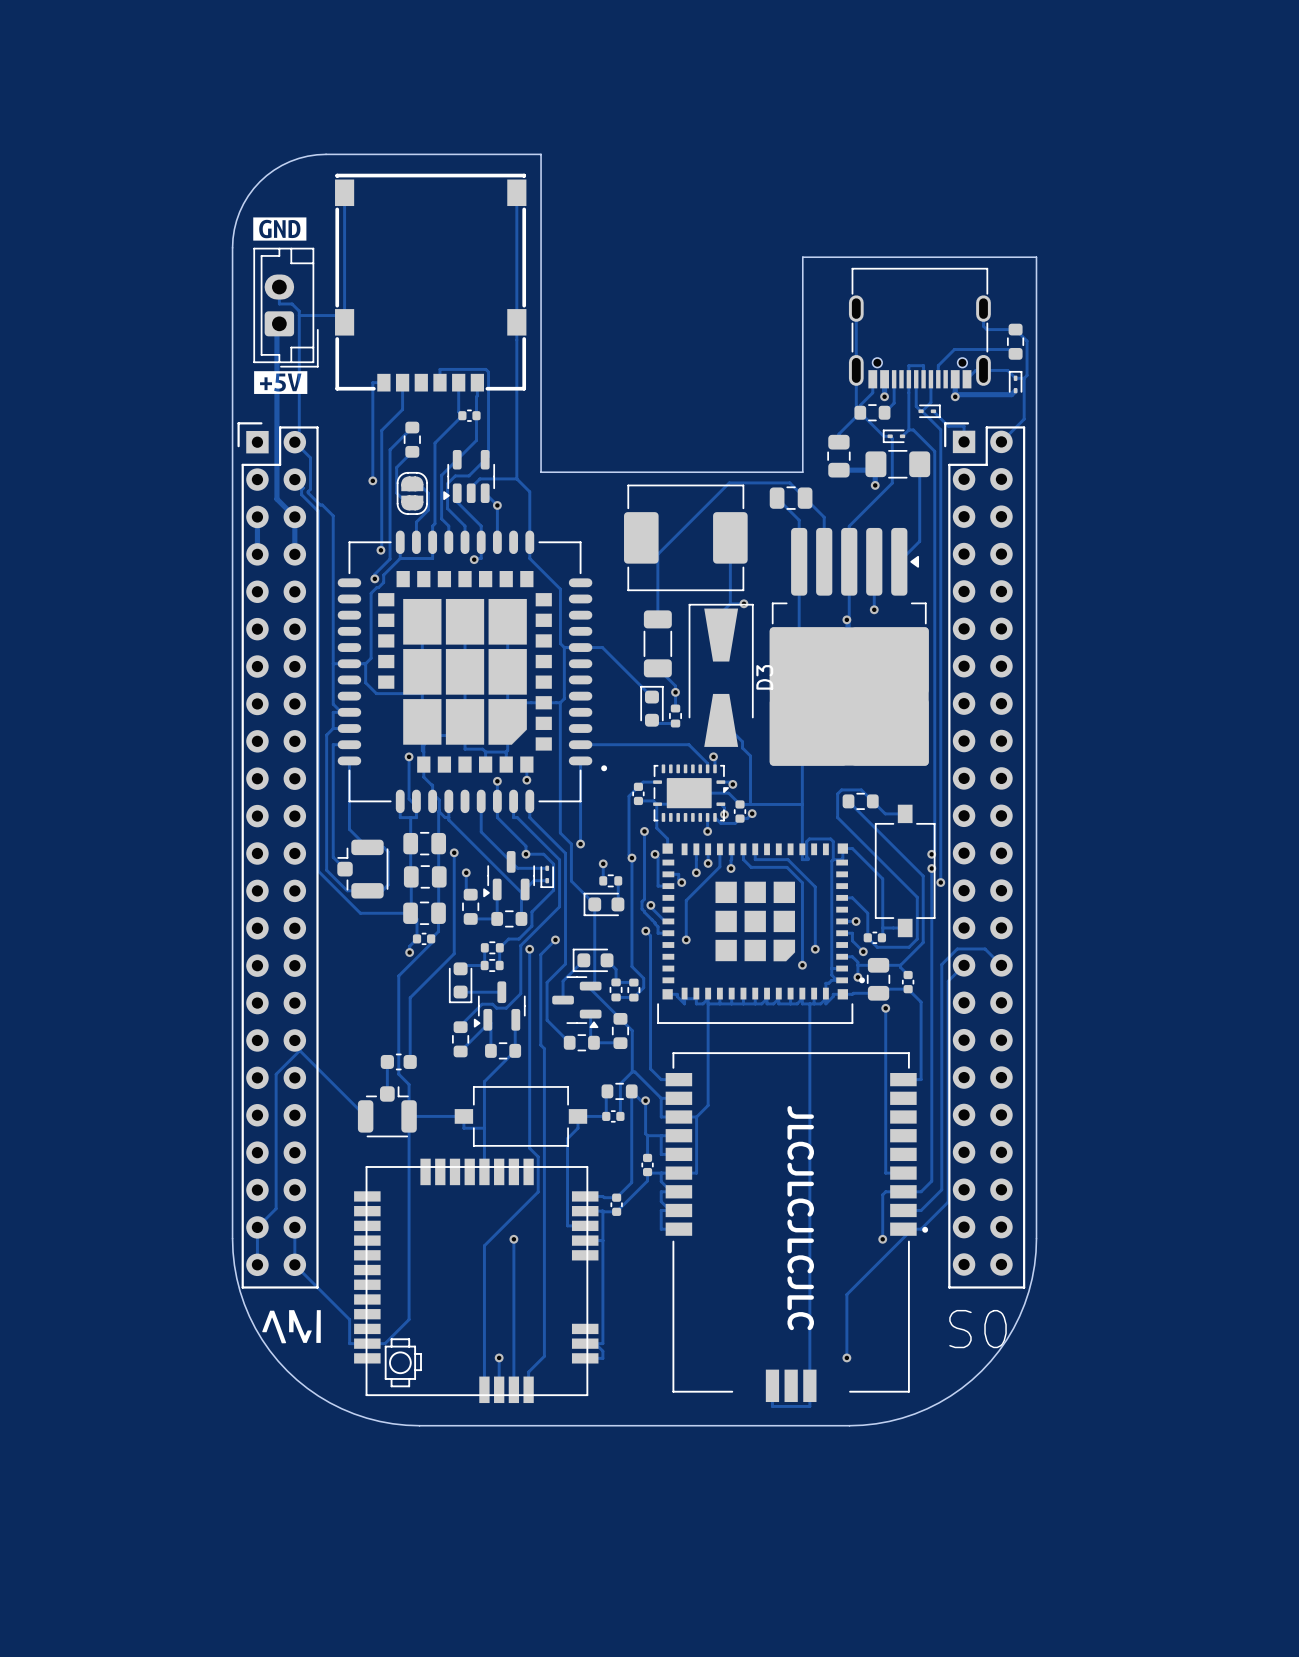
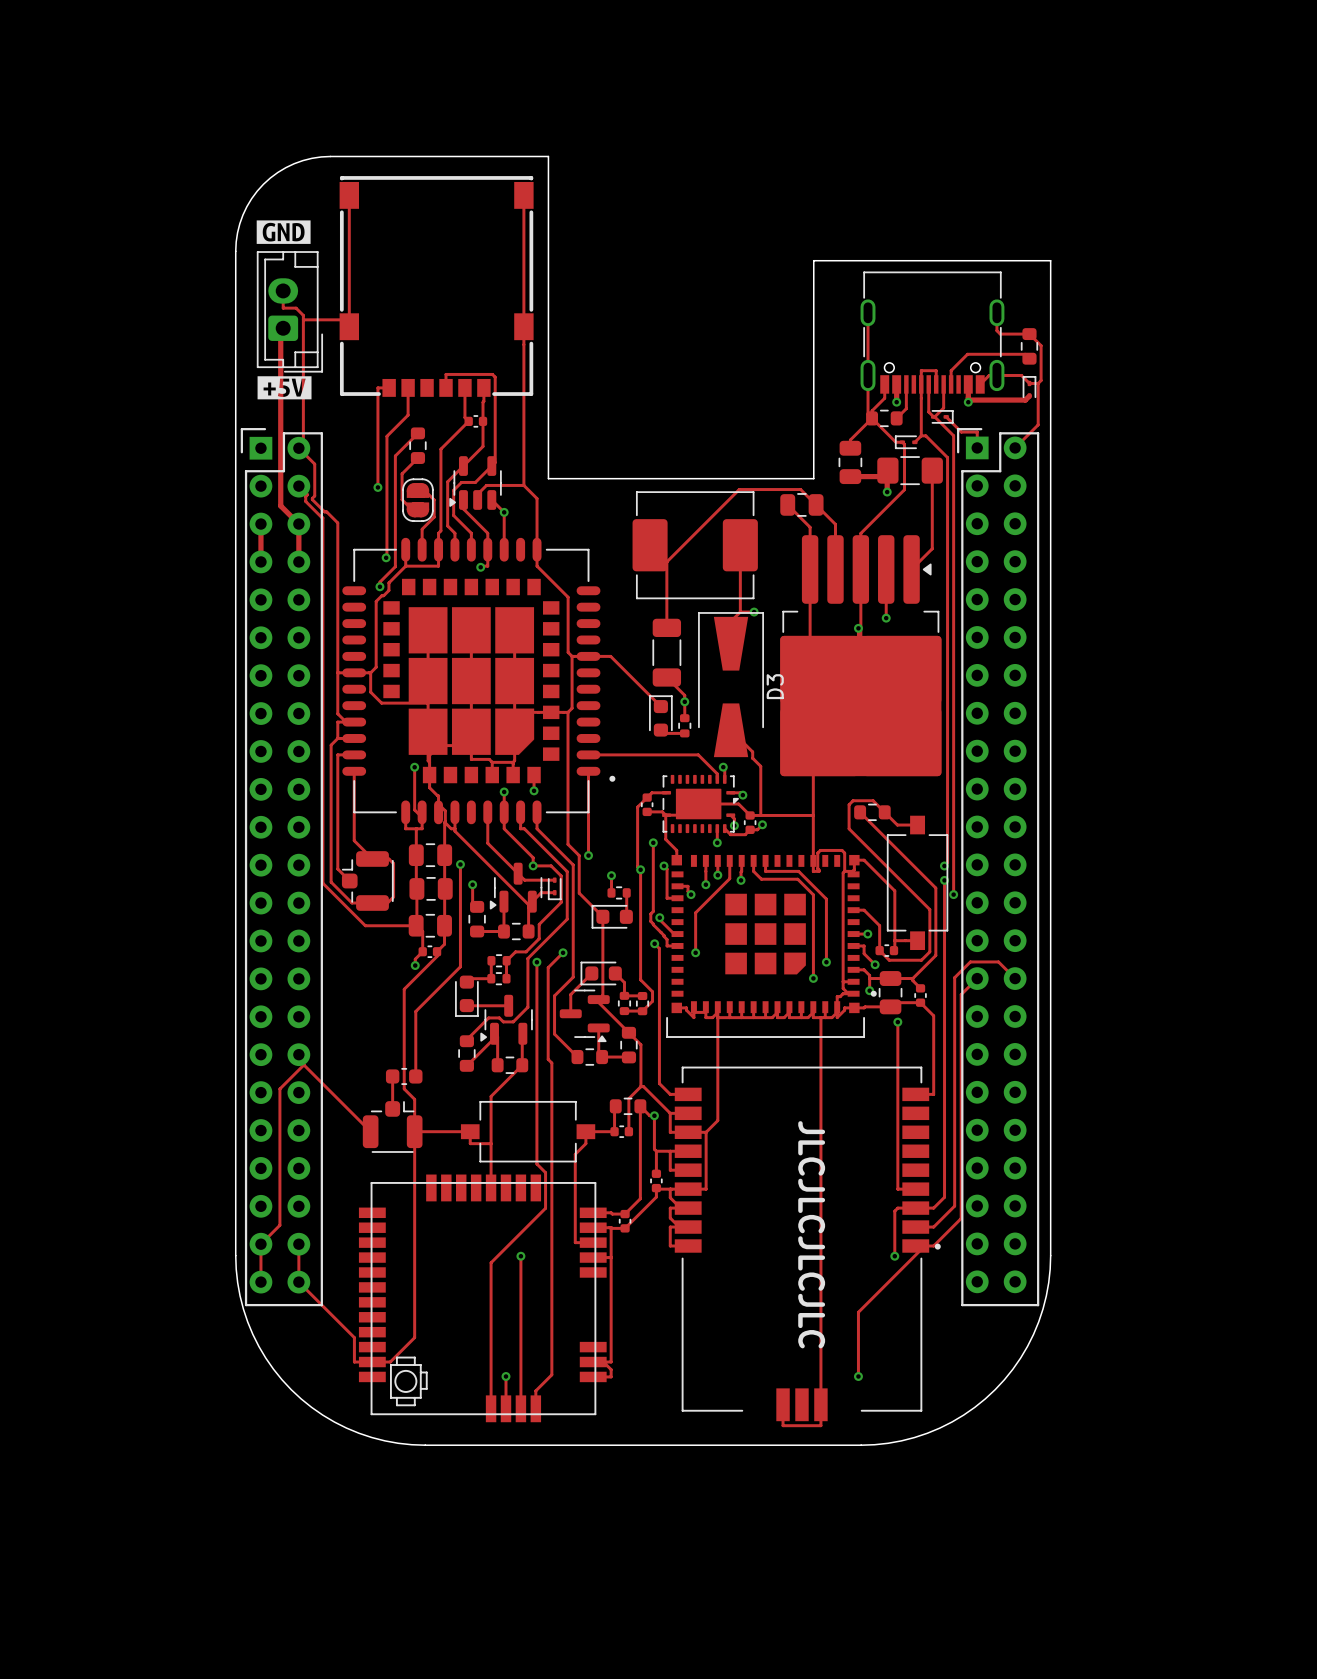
drawing: [262, 1310, 321, 1344] -> none
text: S0 (978, 1329) -> none

